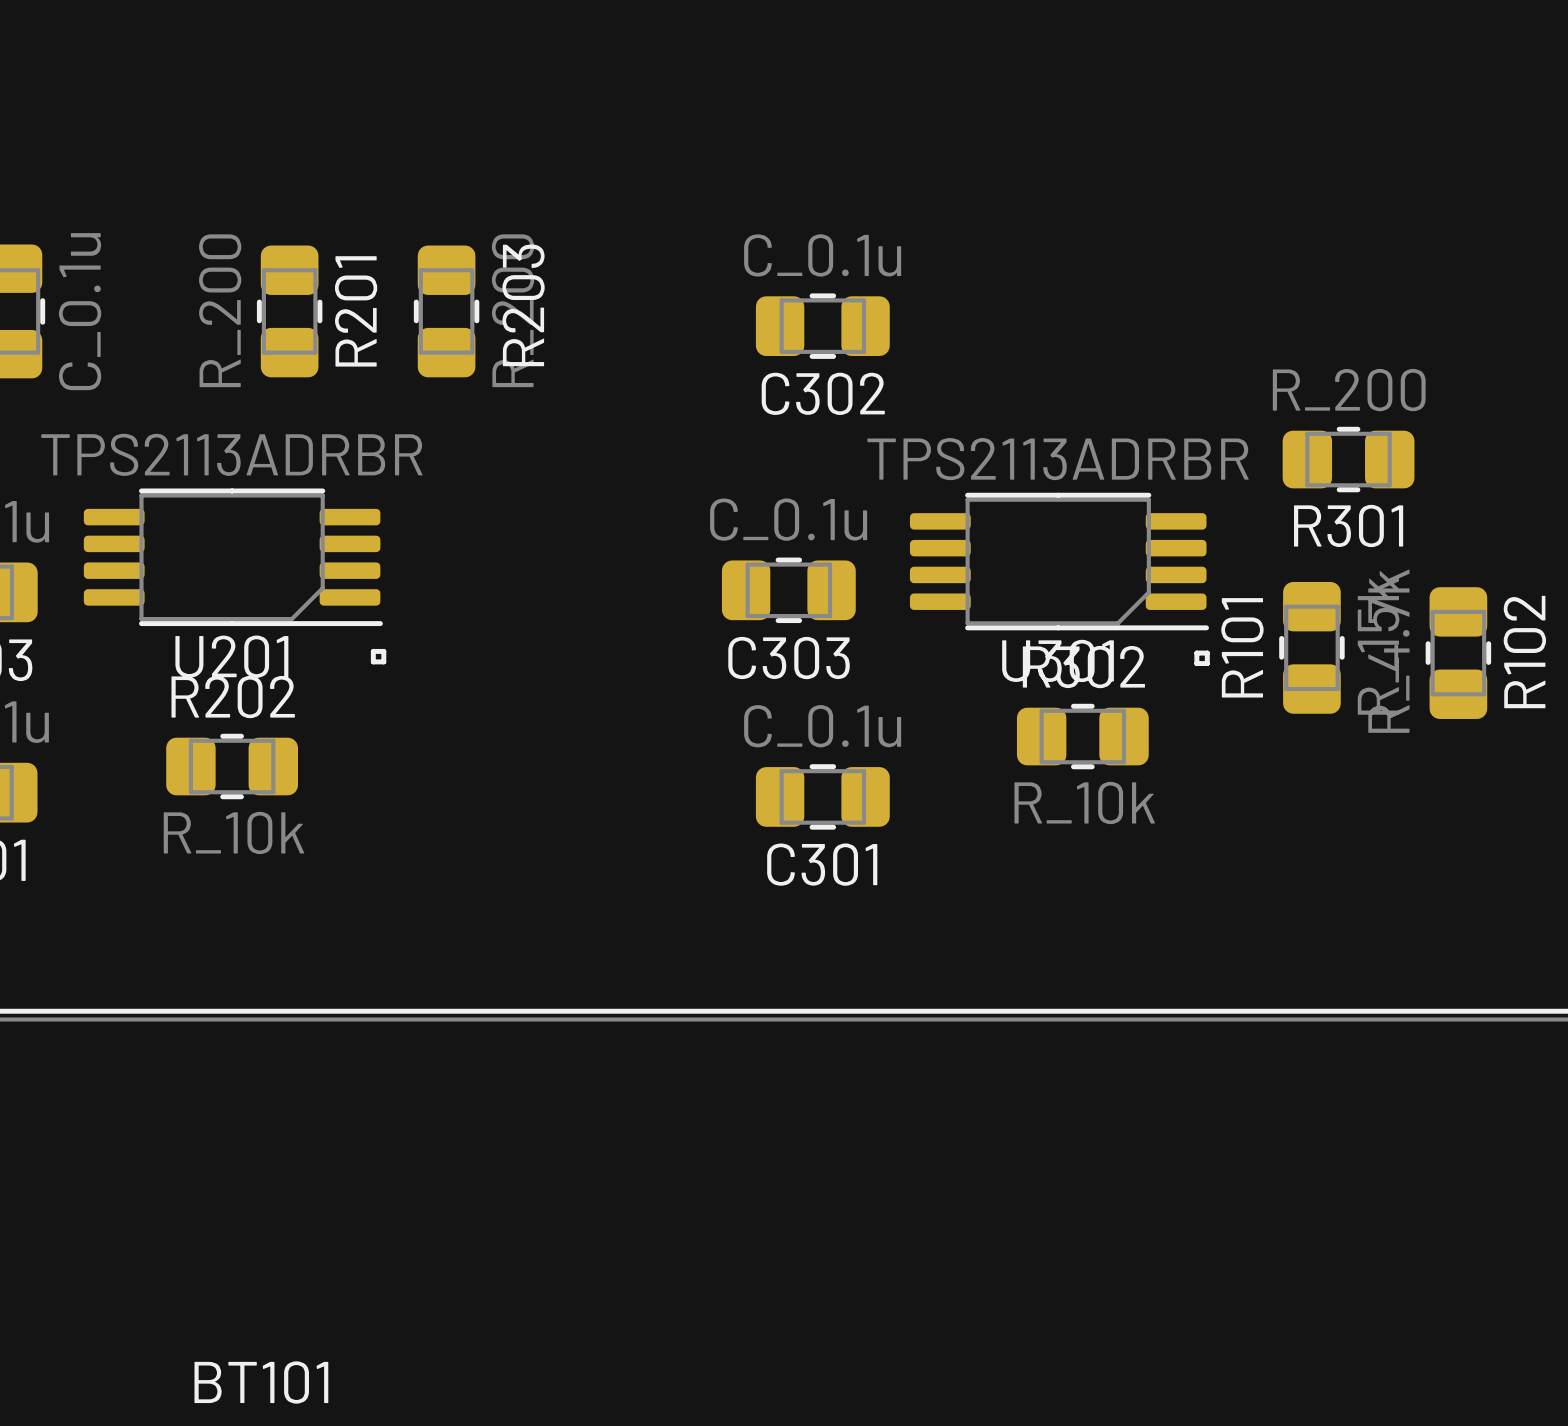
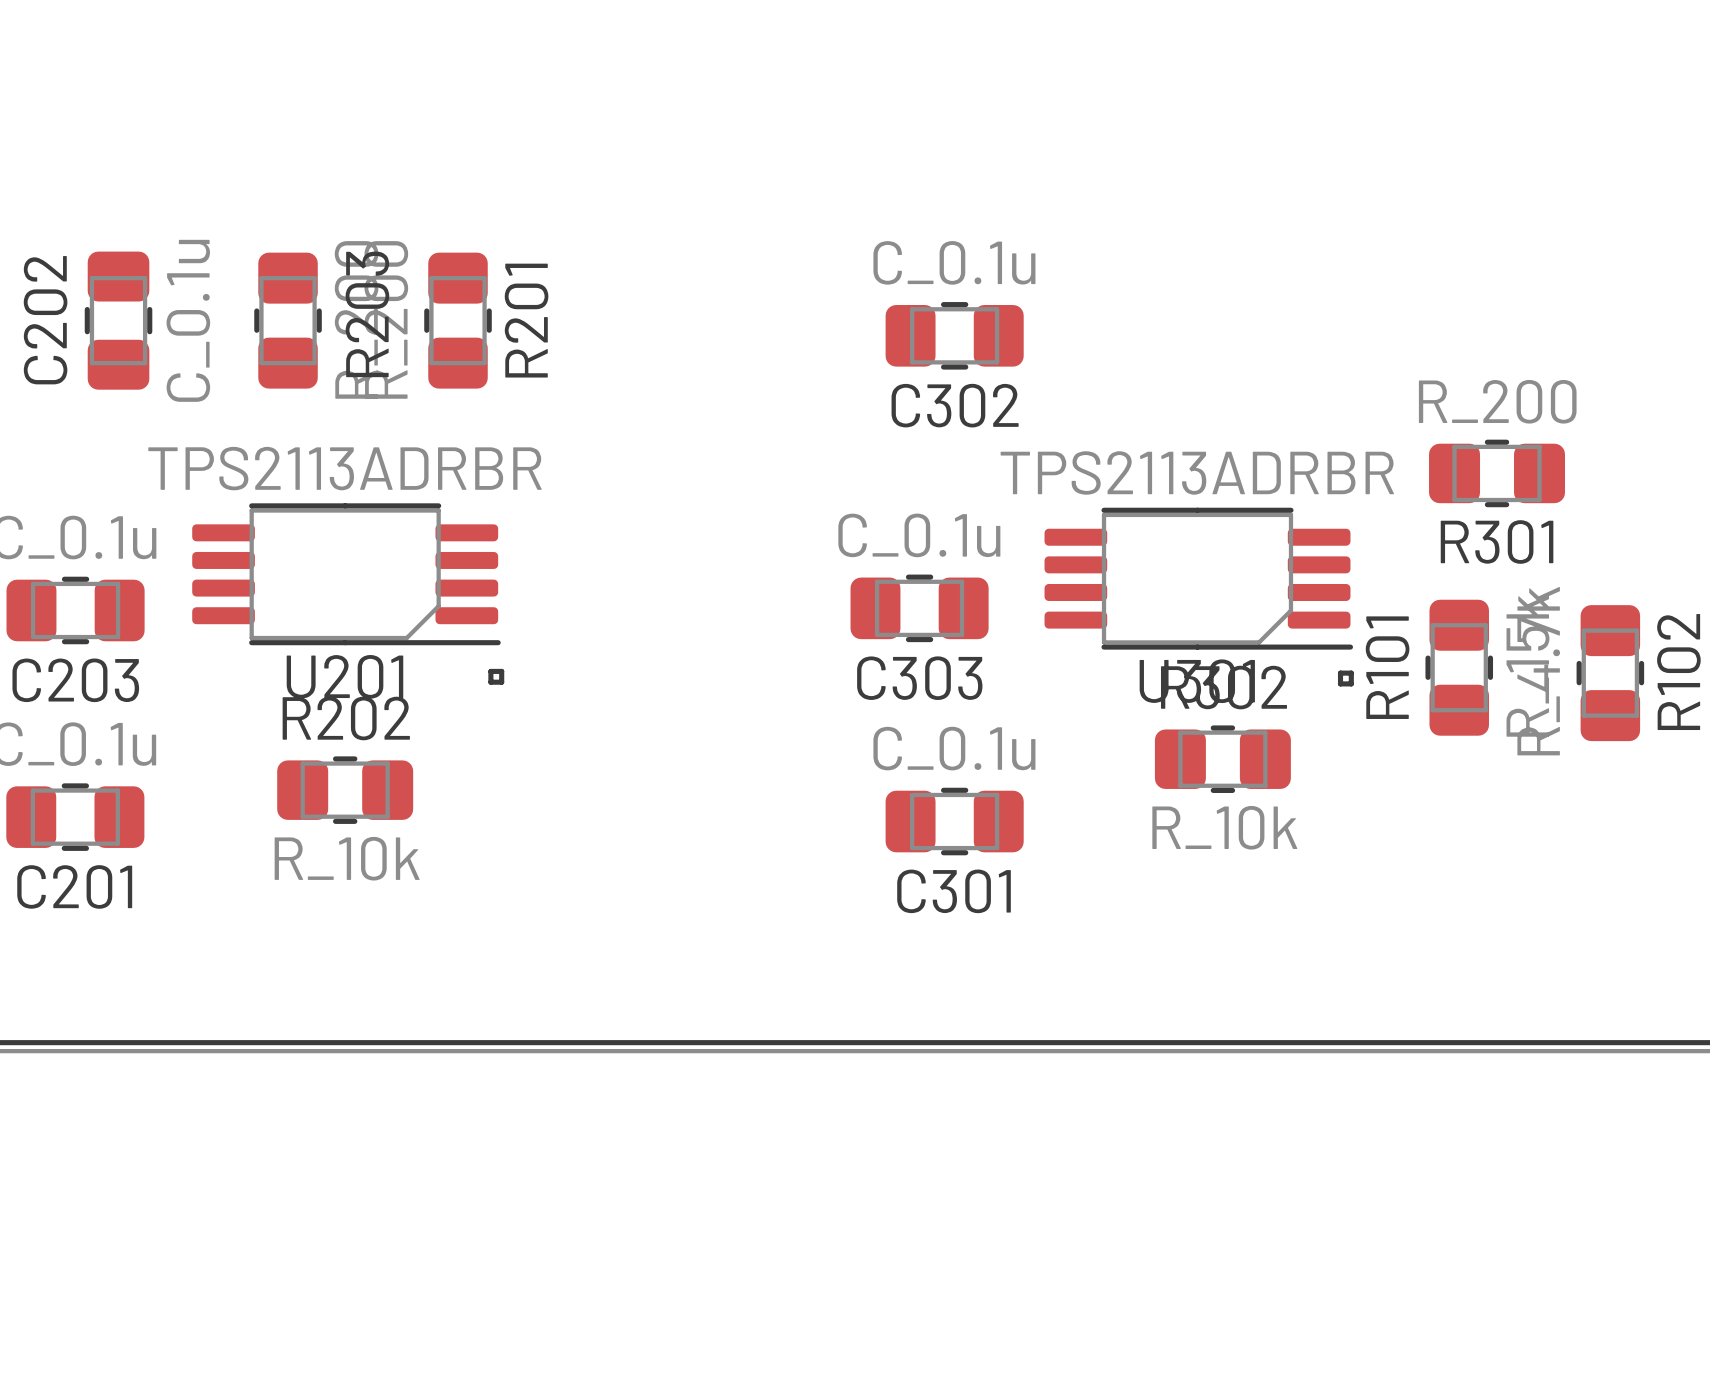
R201 position: (289, 311) -> (458, 320)
R203 position: (446, 311) -> (288, 320)

